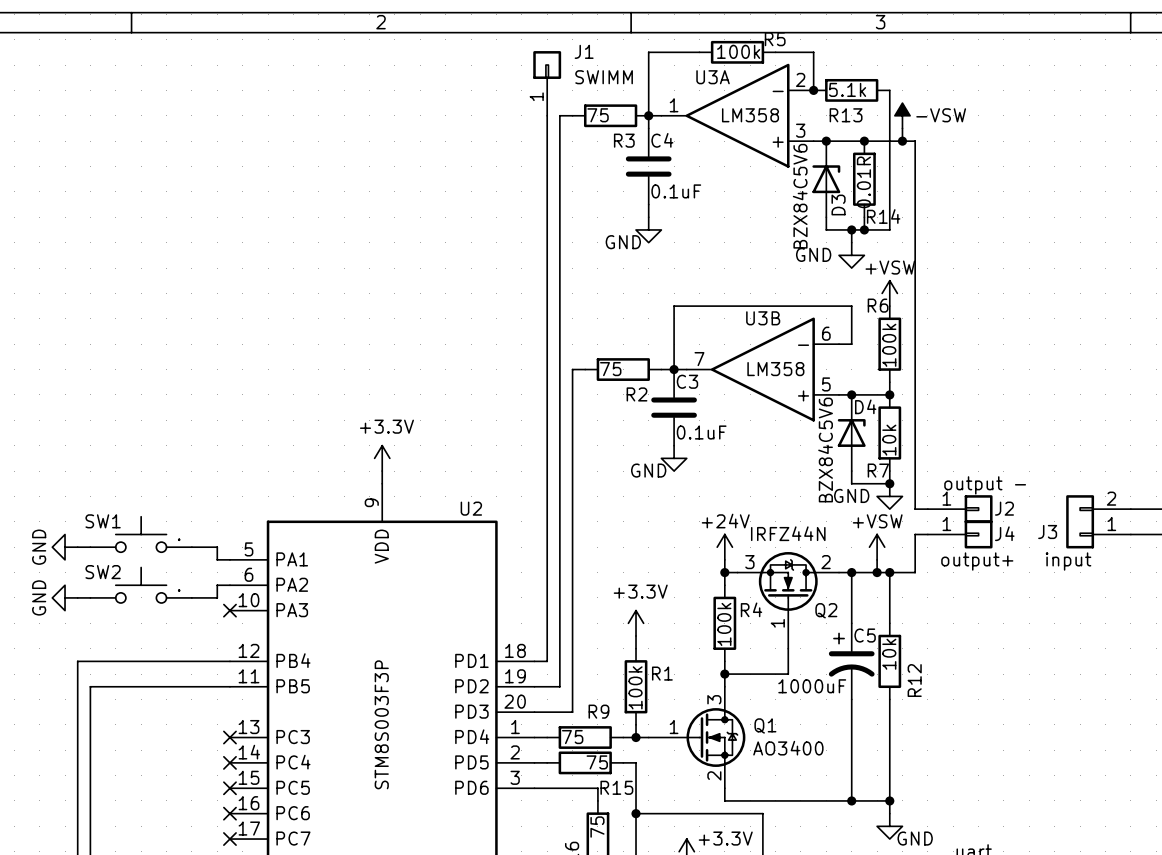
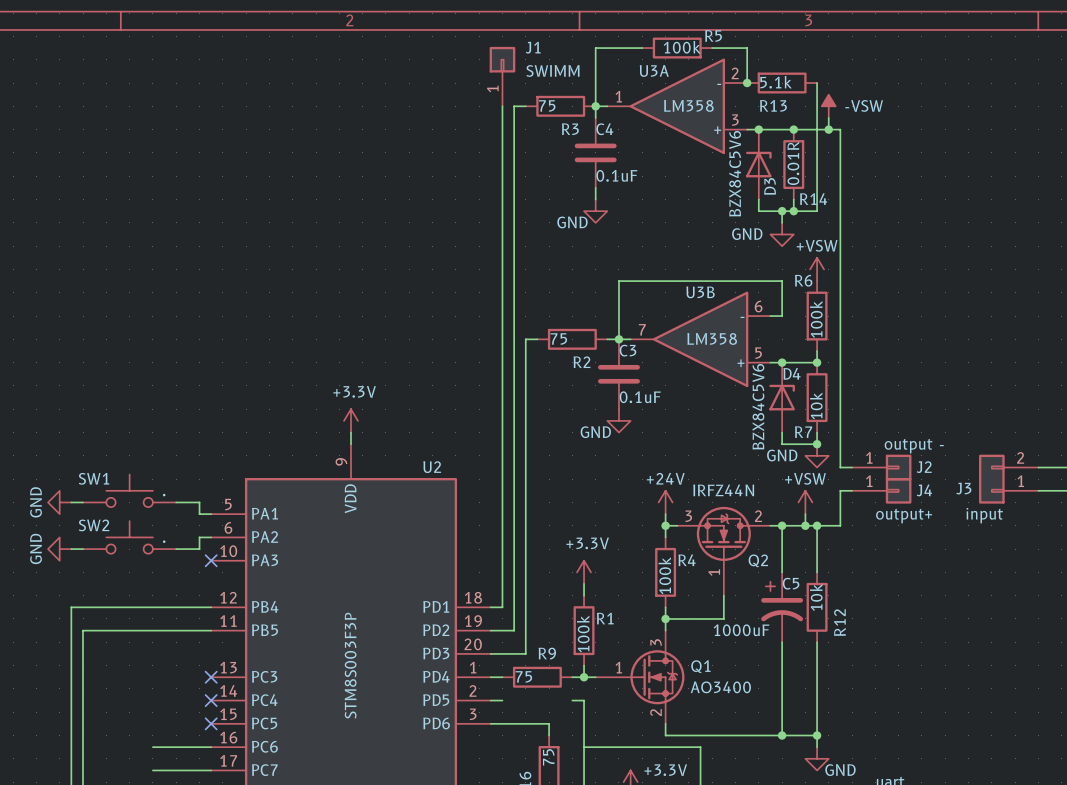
R15: 75 (585, 762) -> none
wire: none -> (152, 747) (211, 747)
no-connect mark: (229, 813) -> none
junction: (636, 813) -> none
wire: none -> (152, 770) (211, 770)
no-connect mark: (229, 839) -> none

